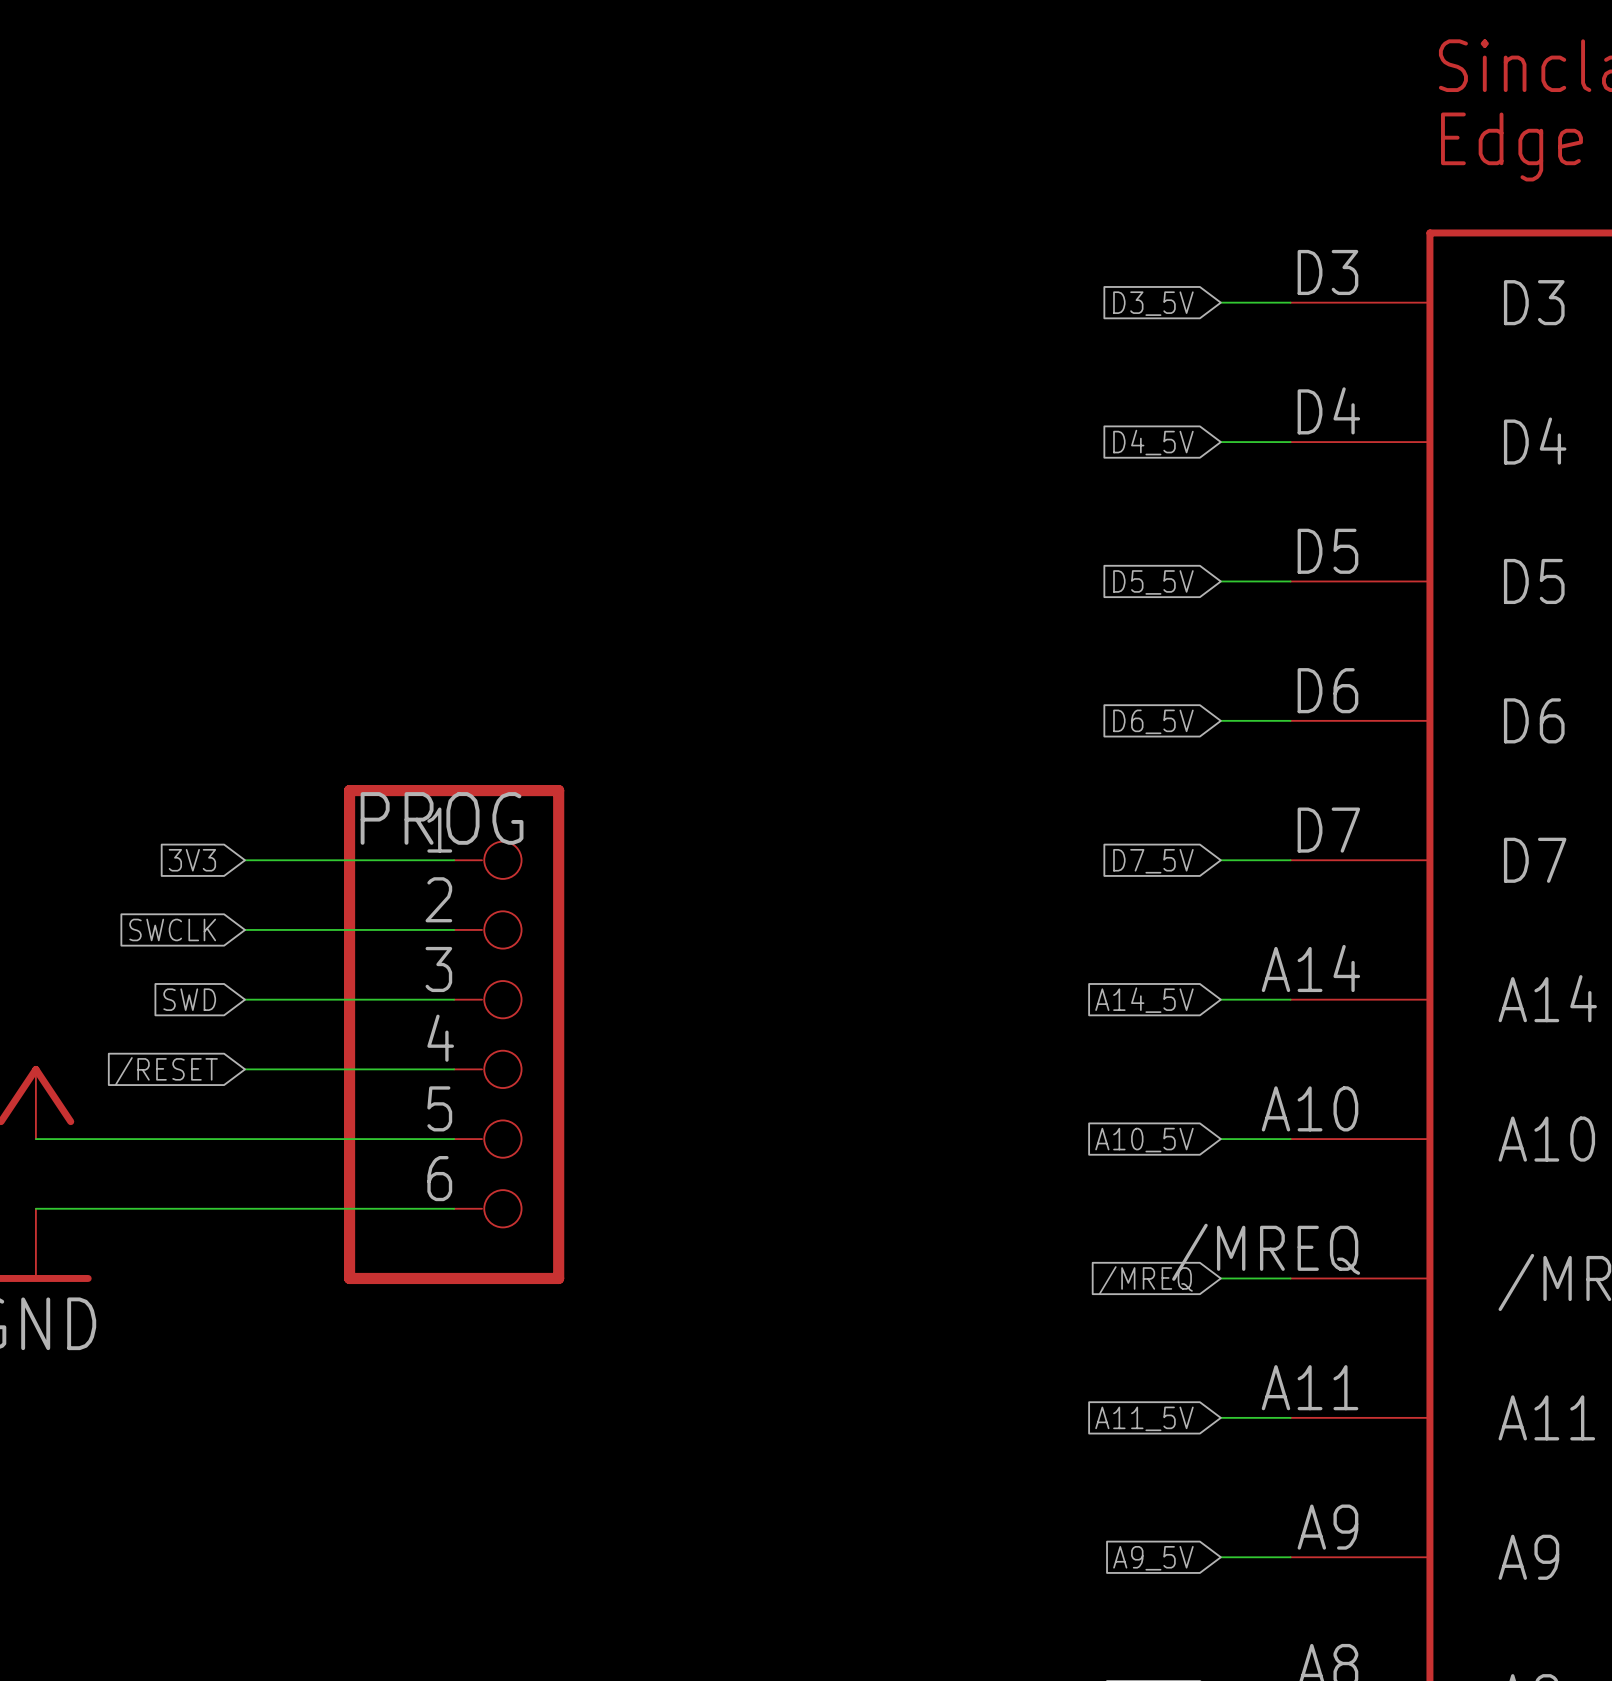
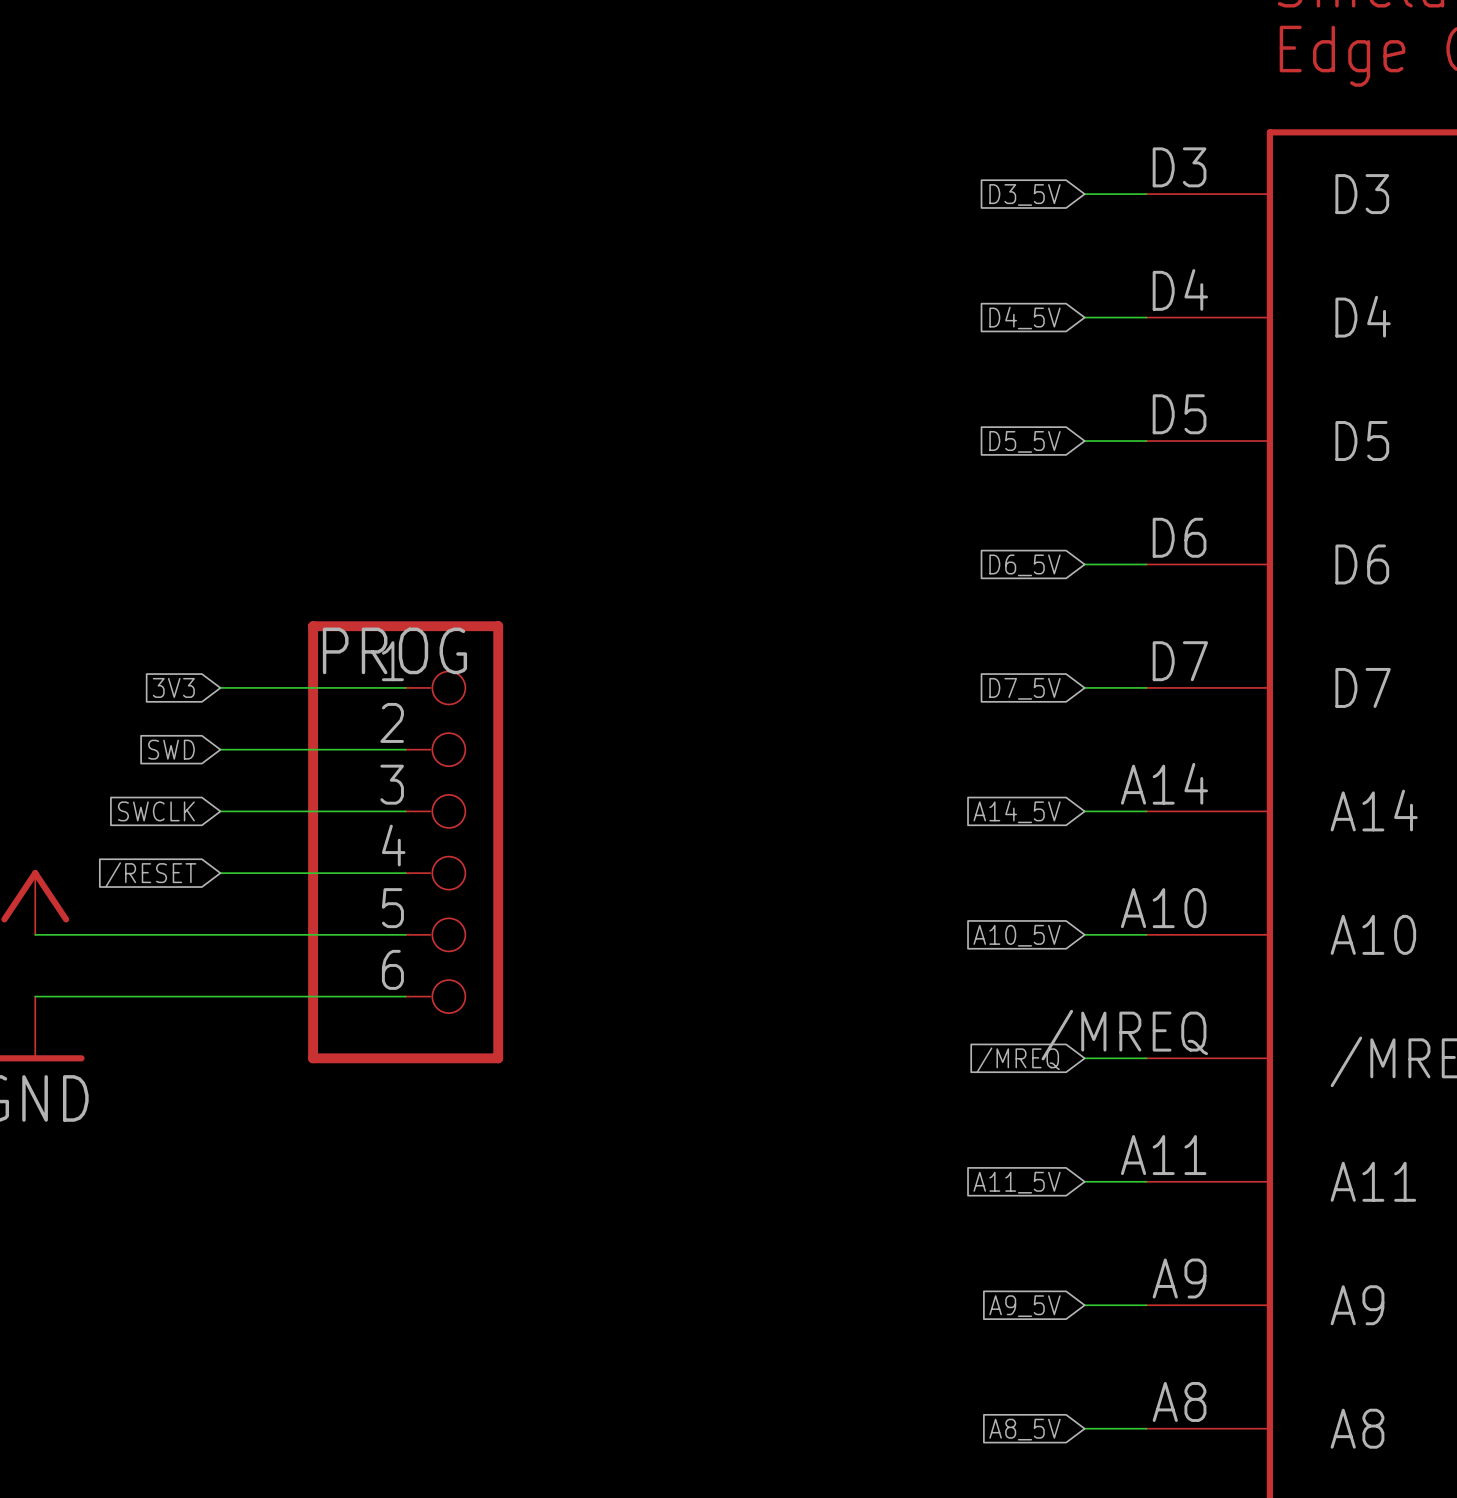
global label: SWCLK (172, 929) -> SWD (171, 749)
global label: SWD (189, 999) -> SWCLK (156, 811)

